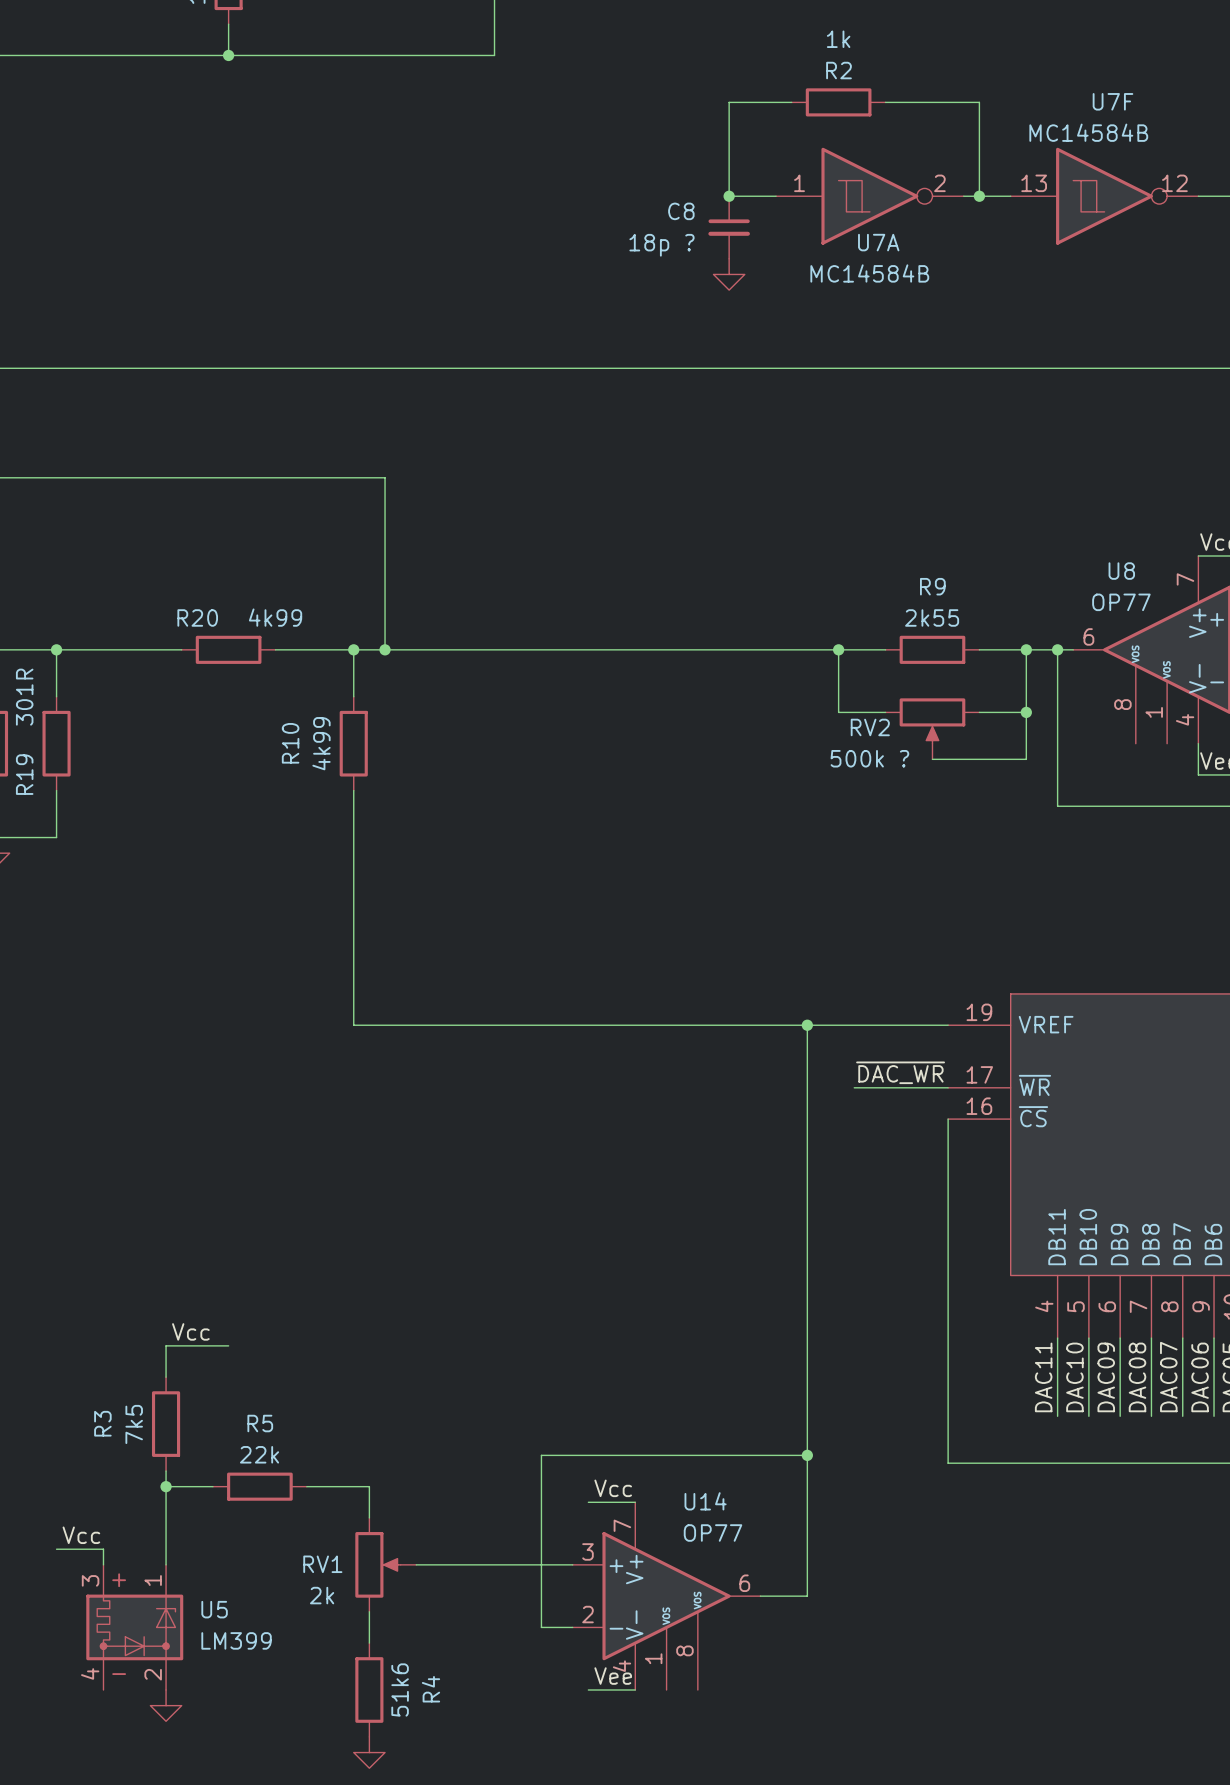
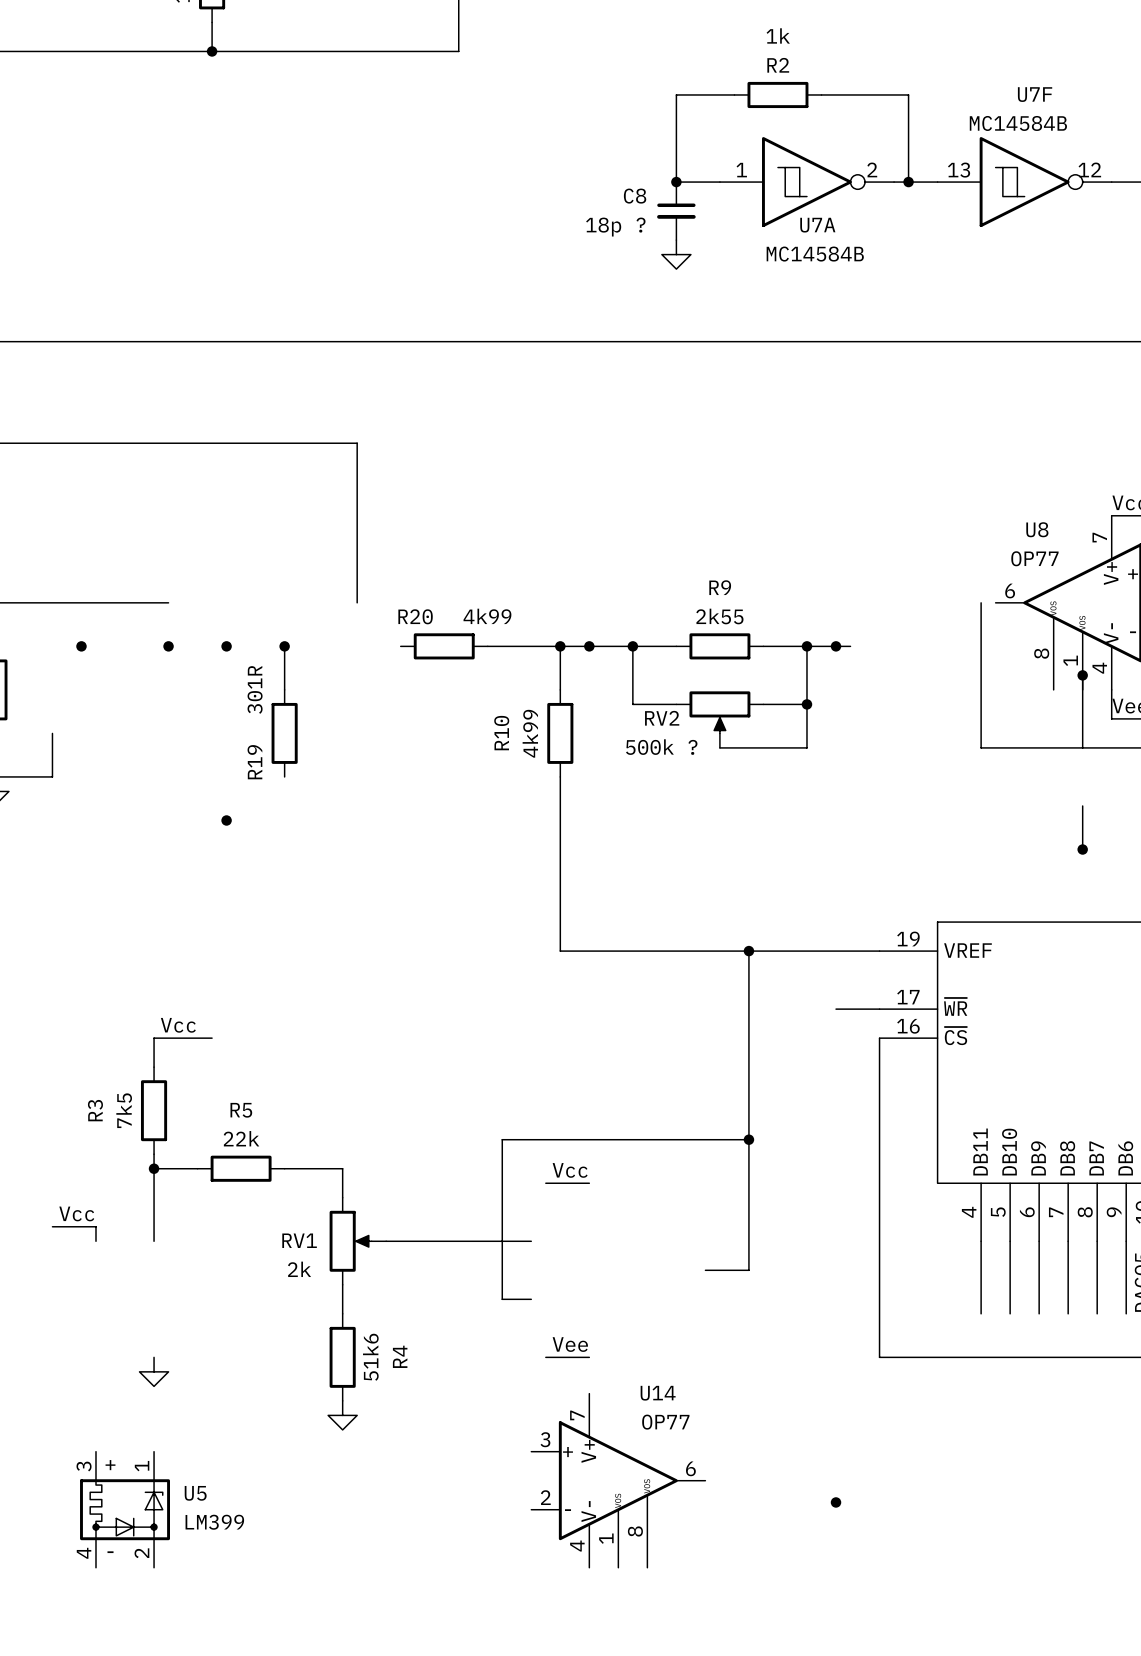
wire: (56, 649) (56, 696) -> (284, 646) (284, 689)
junction: (56, 649) -> none
R20 position: (228, 649) -> (444, 646)
wire: (275, 649) (885, 649) -> none
wire: (353, 649) (353, 696) -> (560, 646) (560, 689)
junction: (353, 649) -> none
junction: (385, 649) -> none
wire: (838, 649) (838, 712) (885, 712) -> (632, 646) (632, 704) (676, 704)
junction: (838, 649) -> none
R9 position: (932, 649) -> (719, 646)
wire: (979, 649) (1073, 649) -> (763, 646) (850, 646)
wire: (1026, 649) (1026, 759) (932, 759) -> (806, 646) (806, 747) (719, 747)
junction: (1026, 649) -> none
junction: (1057, 649) -> none
junction: none -> (81, 646)
junction: none -> (168, 646)
junction: none -> (226, 646)
junction: none -> (284, 646)
wire: none -> (487, 646) (676, 646)
junction: none -> (560, 646)
junction: none -> (589, 646)
junction: none -> (632, 646)
junction: none -> (806, 646)
junction: none -> (836, 646)
wire: (979, 712) (1026, 712) -> (763, 704) (806, 704)
junction: (1026, 712) -> none
RV2 position: (932, 728) -> (719, 719)
wire: none -> (1082, 675) (1082, 747)
junction: none -> (1082, 675)
R19 position: (56, 743) -> (284, 733)
R10 position: (353, 743) -> (560, 733)
junction: none -> (806, 704)
wire: (353, 790) (353, 1025) (604, 1025) -> (560, 776) (560, 951)
wire: none -> (1082, 805) (1082, 849)
junction: none -> (226, 820)
junction: none -> (1082, 849)
label: ~{DAC_WR} (900, 1072) -> none
wire: (854, 1087) (901, 1087) -> none
label: none -> Vcc (178, 1025)
junction: none -> (748, 1139)
junction: none -> (154, 1168)
label: none -> Vcc (570, 1170)
label position: Vcc (190, 1331) -> Vcc (76, 1213)
wire: (228, 1345) (166, 1345) (166, 1377) -> (212, 1038) (154, 1038) (154, 1067)
wire: (807, 1369) (807, 1596) (760, 1596) -> (748, 1270) (705, 1270)
label: DAC11 (1043, 1377) -> none
label: DAC10 (1074, 1377) -> none
label: DAC09 (1106, 1377) -> none
label: DAC08 (1137, 1377) -> none
label: DAC07 (1168, 1377) -> none
label: DAC06 (1200, 1377) -> none
R3 position: (166, 1424) -> (154, 1110)
wire: (807, 1455) (541, 1455) (541, 1627) (572, 1627) -> (748, 1139) (502, 1139) (502, 1299) (531, 1299)
junction: (807, 1455) -> none
wire: (166, 1471) (166, 1564) -> (154, 1154) (154, 1241)
power symbol: none -> (154, 1371)
wire: (166, 1486) (212, 1486) -> (154, 1168) (197, 1168)
junction: (166, 1486) -> none
R5 position: (259, 1486) -> (241, 1168)
wire: (306, 1486) (369, 1486) (369, 1517) -> (284, 1168) (342, 1168) (342, 1197)
label: Vcc (613, 1488) -> none
wire: (588, 1502) (635, 1502) -> (545, 1183) (589, 1183)
power symbol: none -> (342, 1415)
label: Vcc (81, 1535) -> none
wire: (56, 1549) (103, 1549) (103, 1564) -> (52, 1226) (95, 1226) (95, 1241)
RV1 position: (385, 1564) -> (357, 1241)
wire: (416, 1564) (572, 1564) -> (386, 1241) (531, 1241)
wire: (369, 1611) (369, 1643) -> (342, 1284) (342, 1313)
junction: none -> (836, 1502)
label position: Vee (613, 1676) -> Vee (570, 1344)
R4 position: (369, 1690) -> (342, 1357)
wire: (588, 1690) (635, 1690) -> (545, 1357) (589, 1357)
power symbol: (166, 1705) -> none
power symbol: (369, 1752) -> none

